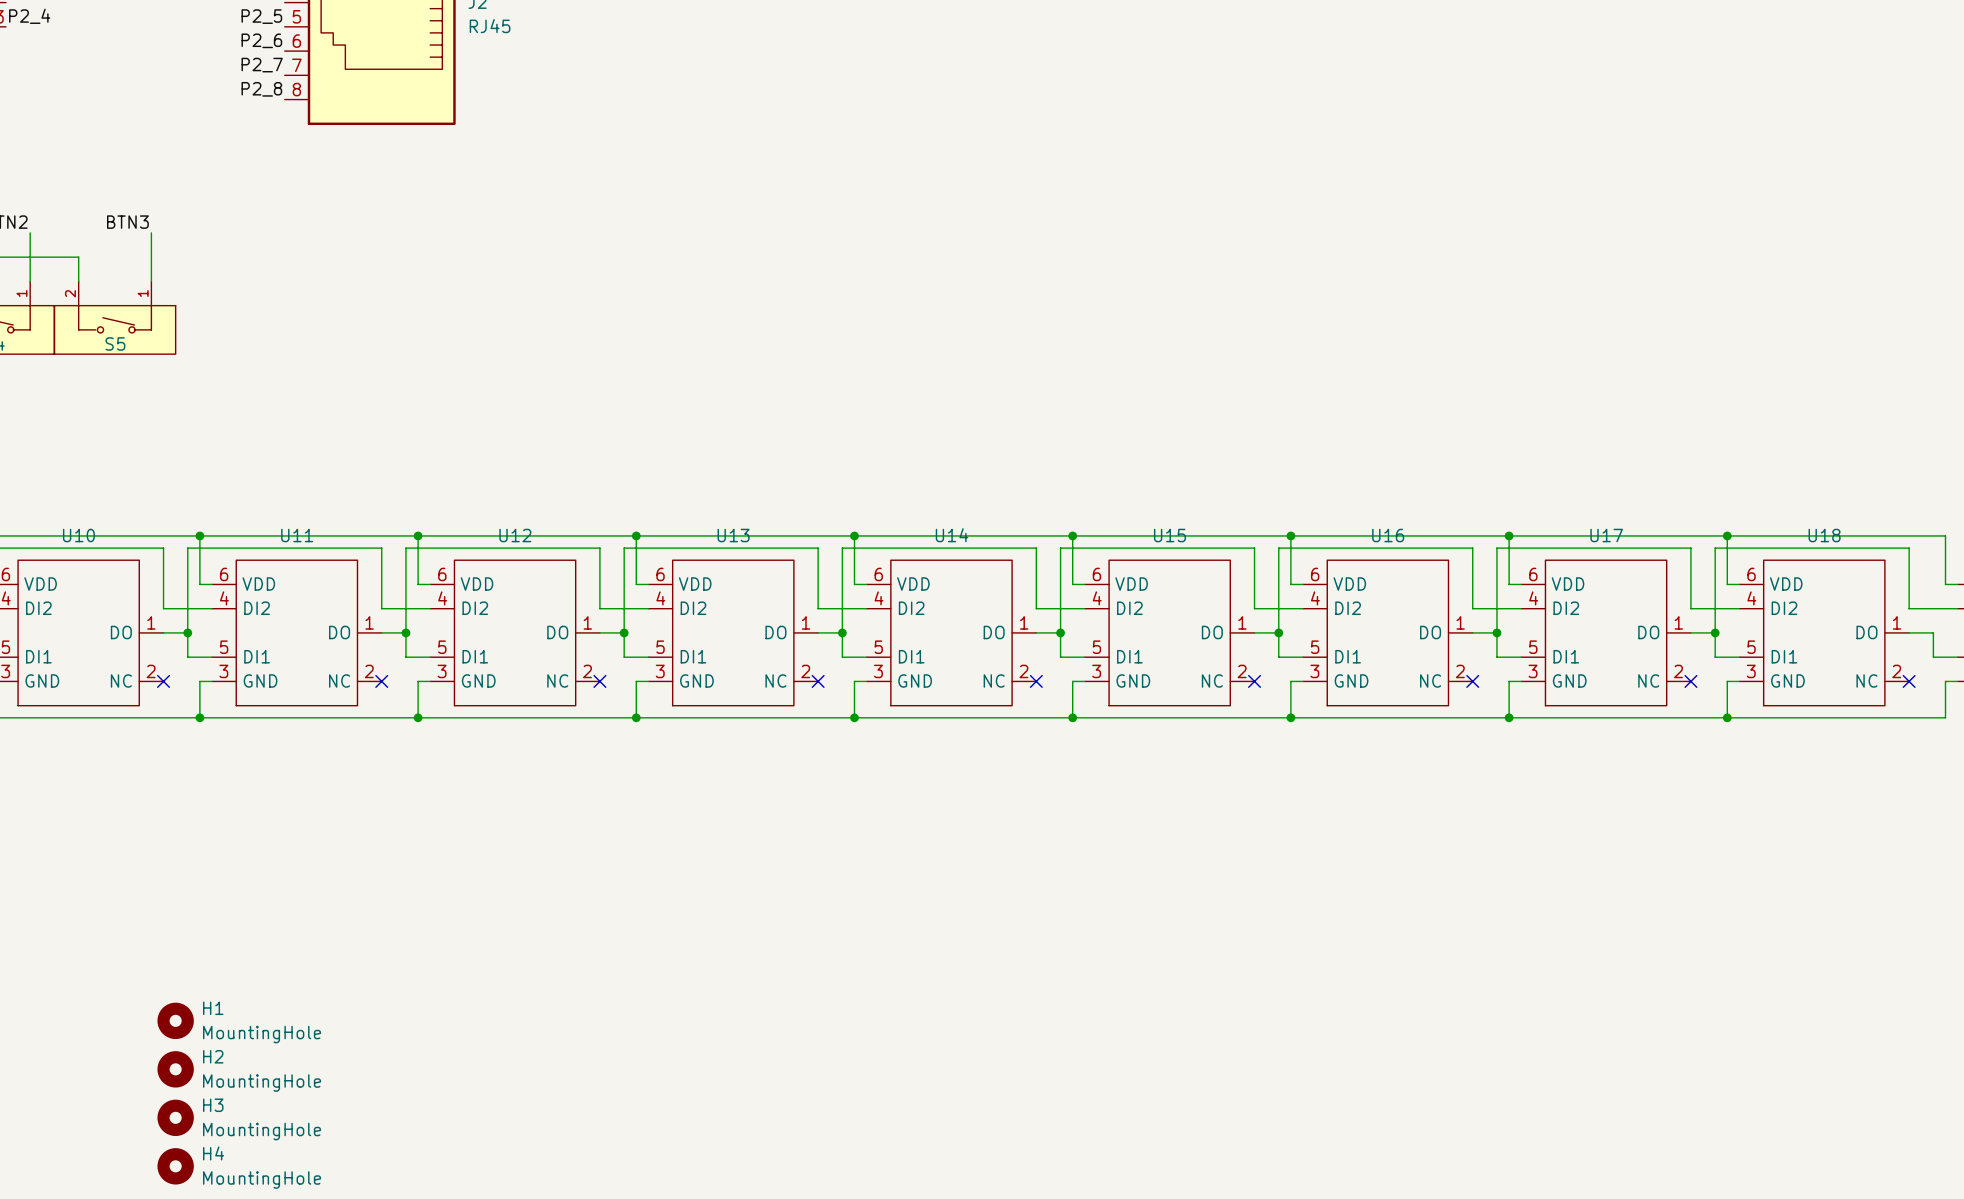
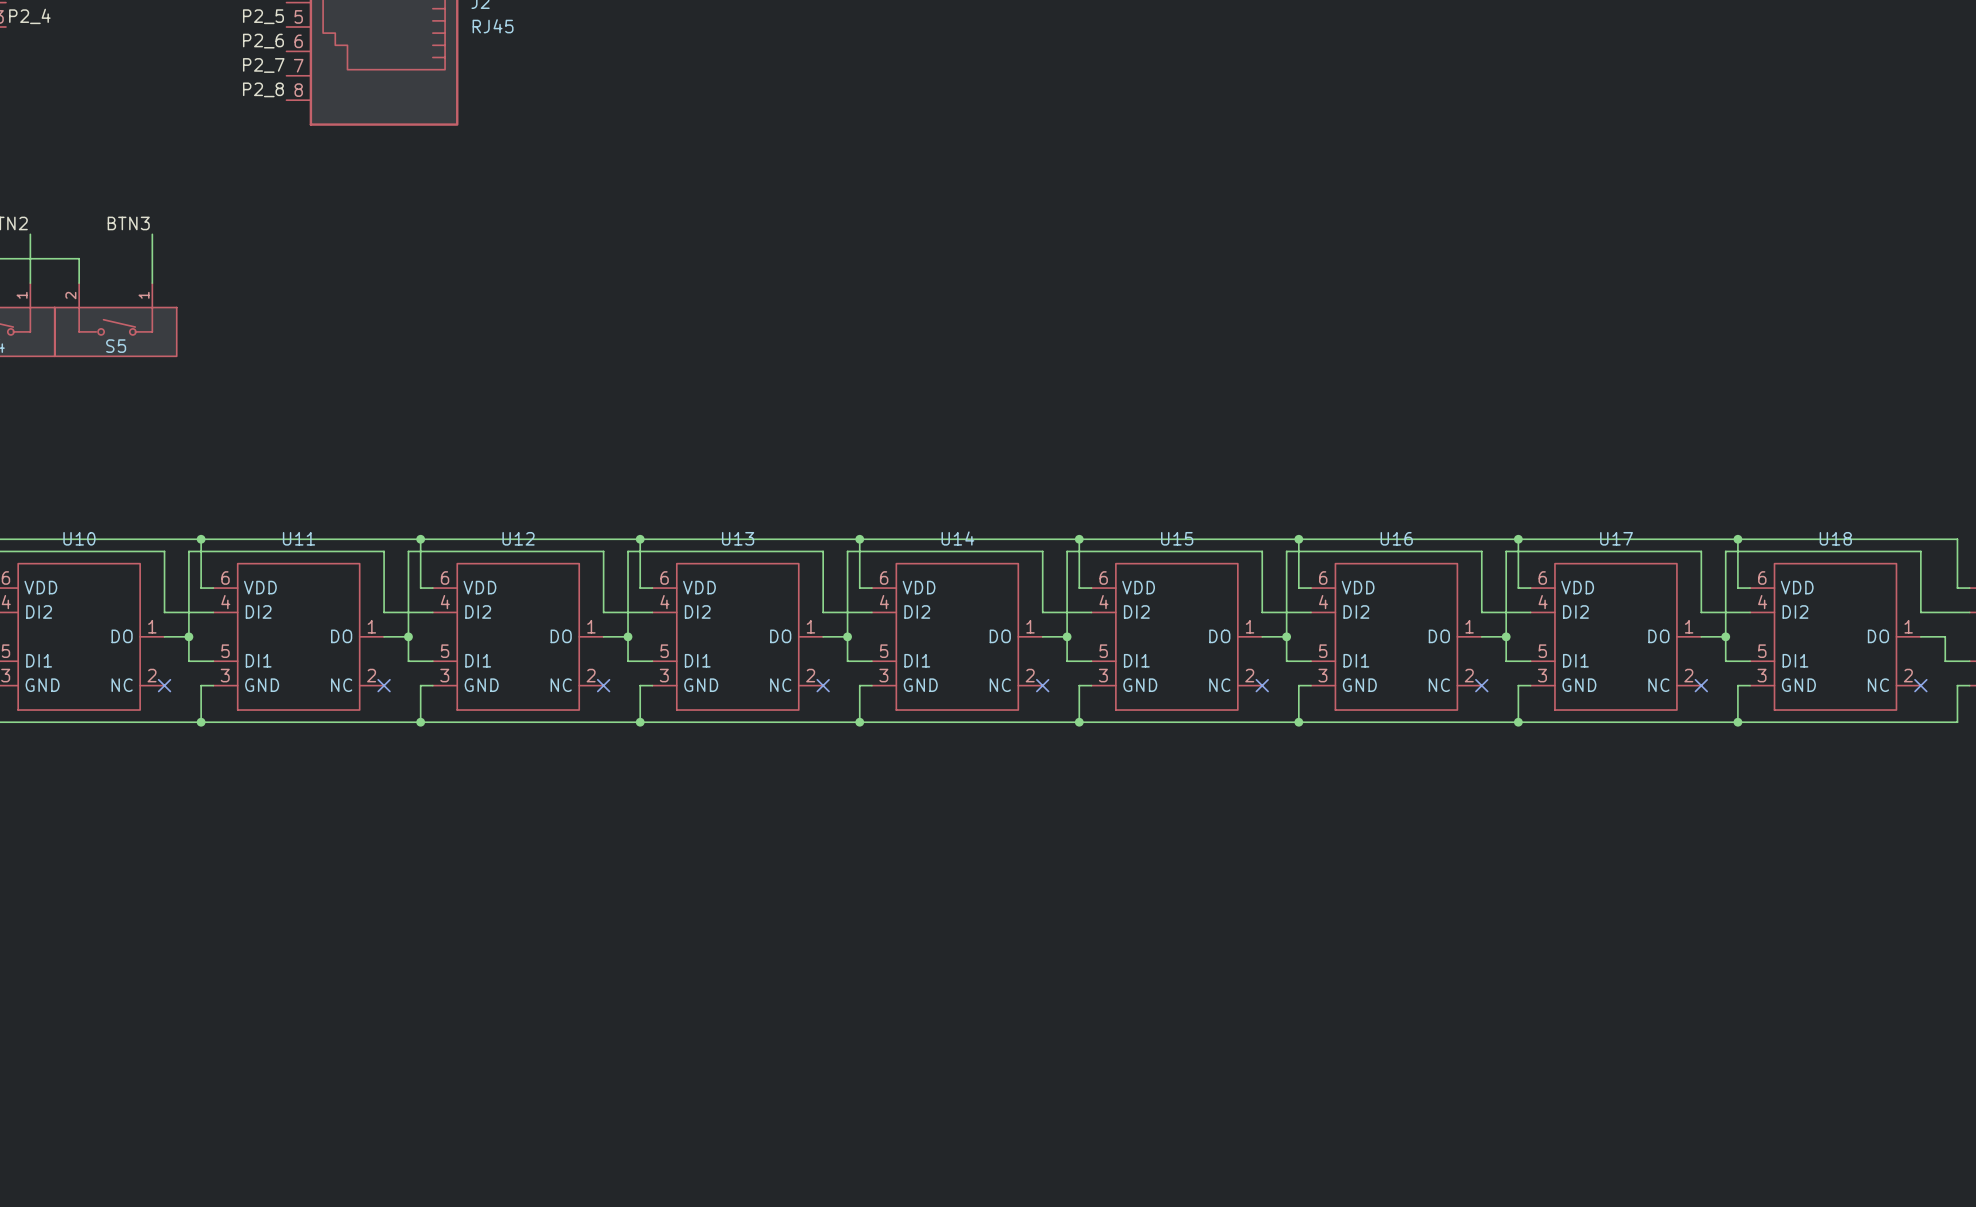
H1: MountingHole (175, 1020) -> none
H2: MountingHole (175, 1069) -> none
H3: MountingHole (175, 1117) -> none
H4: MountingHole (175, 1166) -> none

